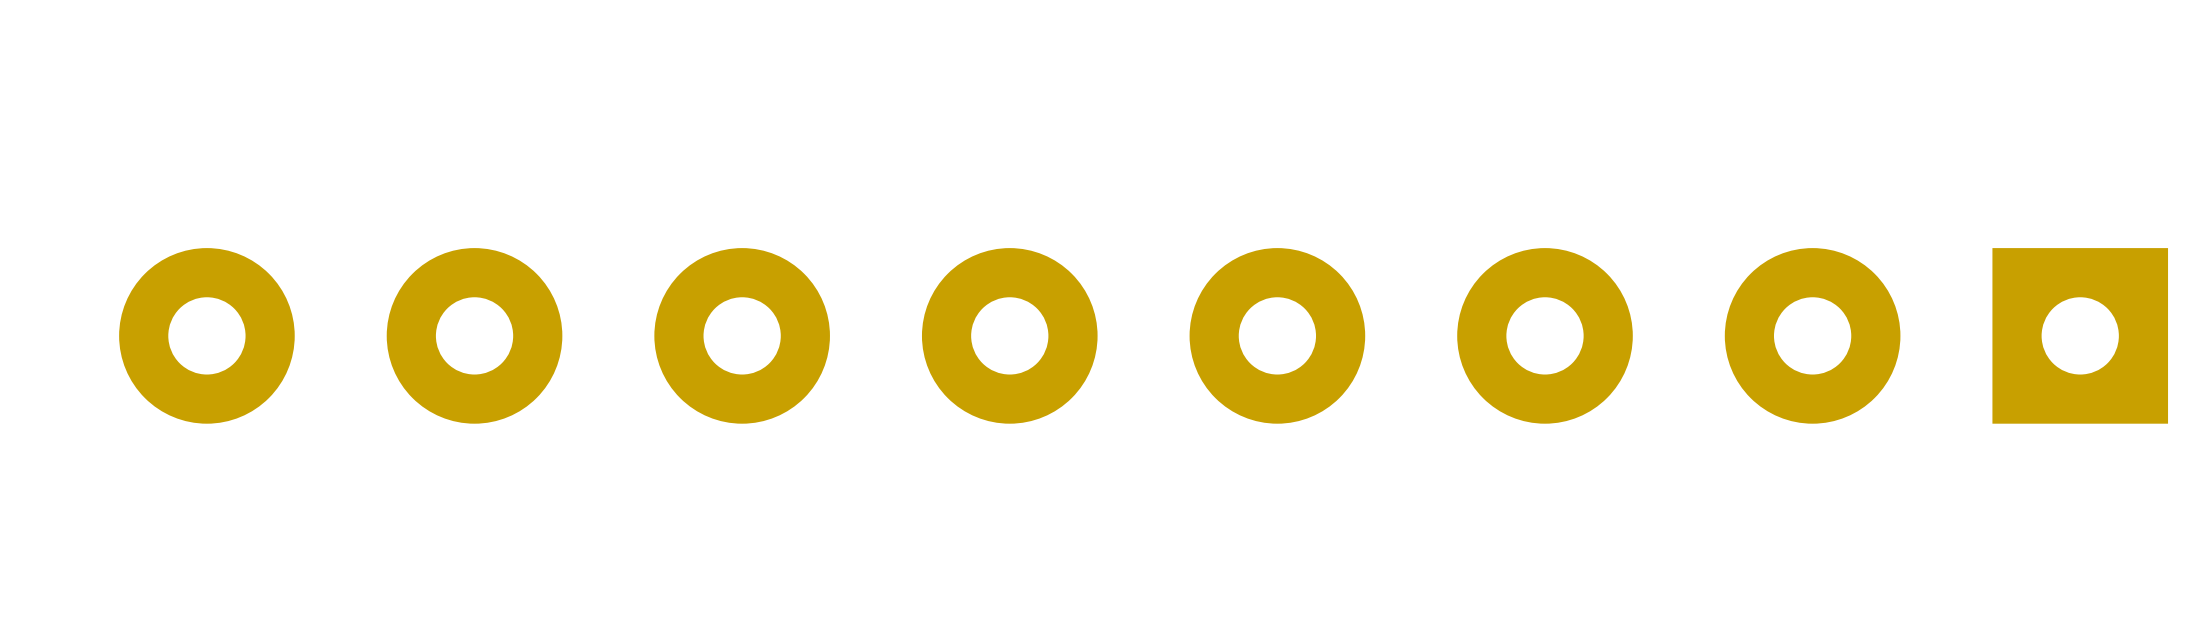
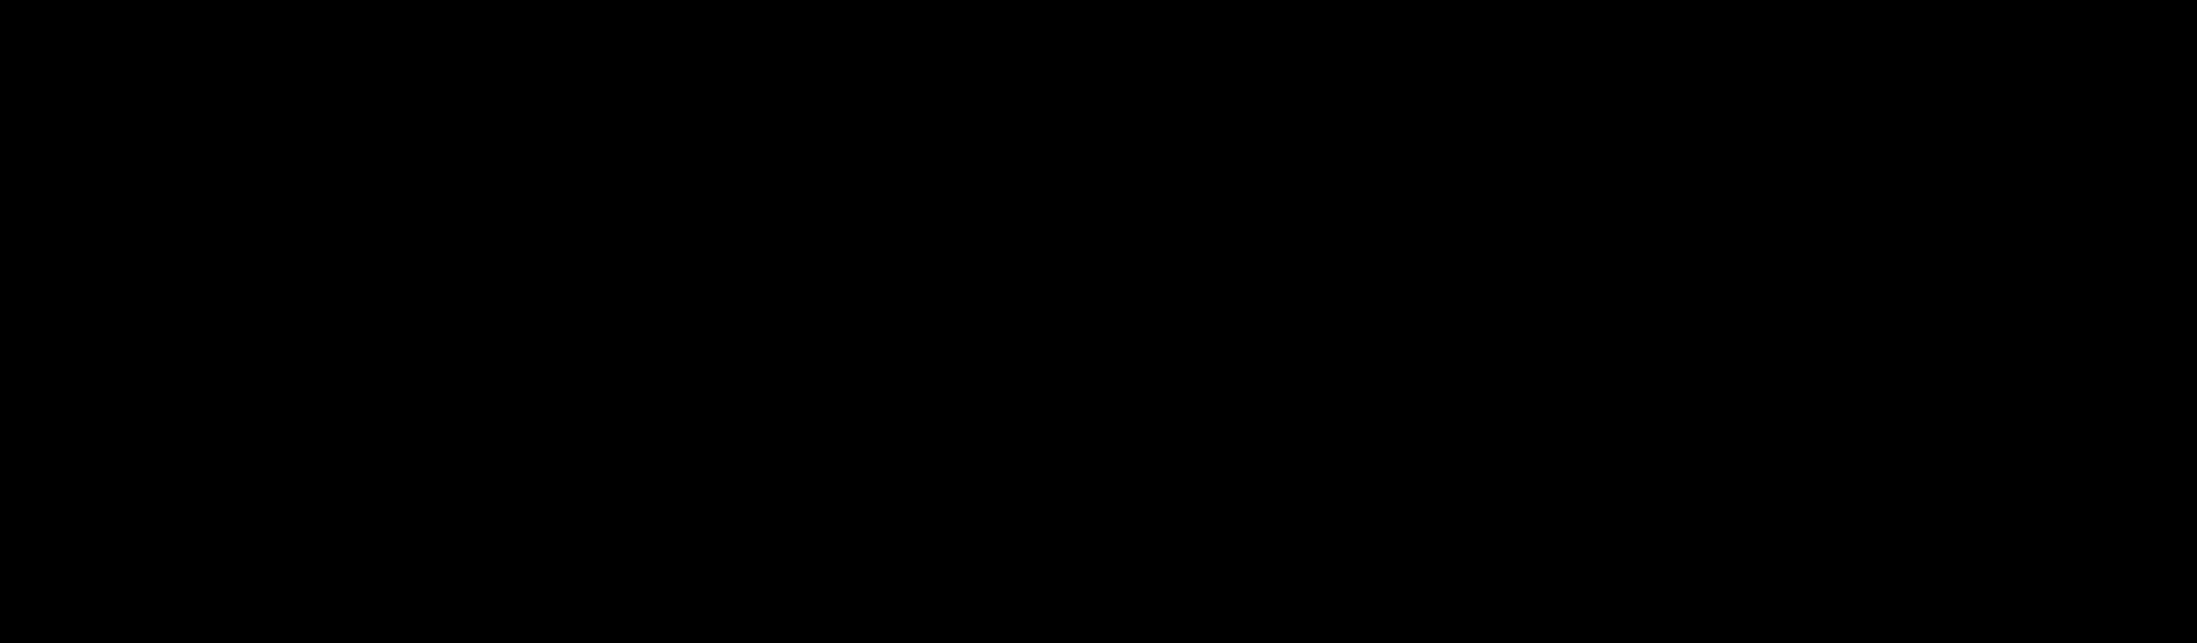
part: (1143, 335) -> none

